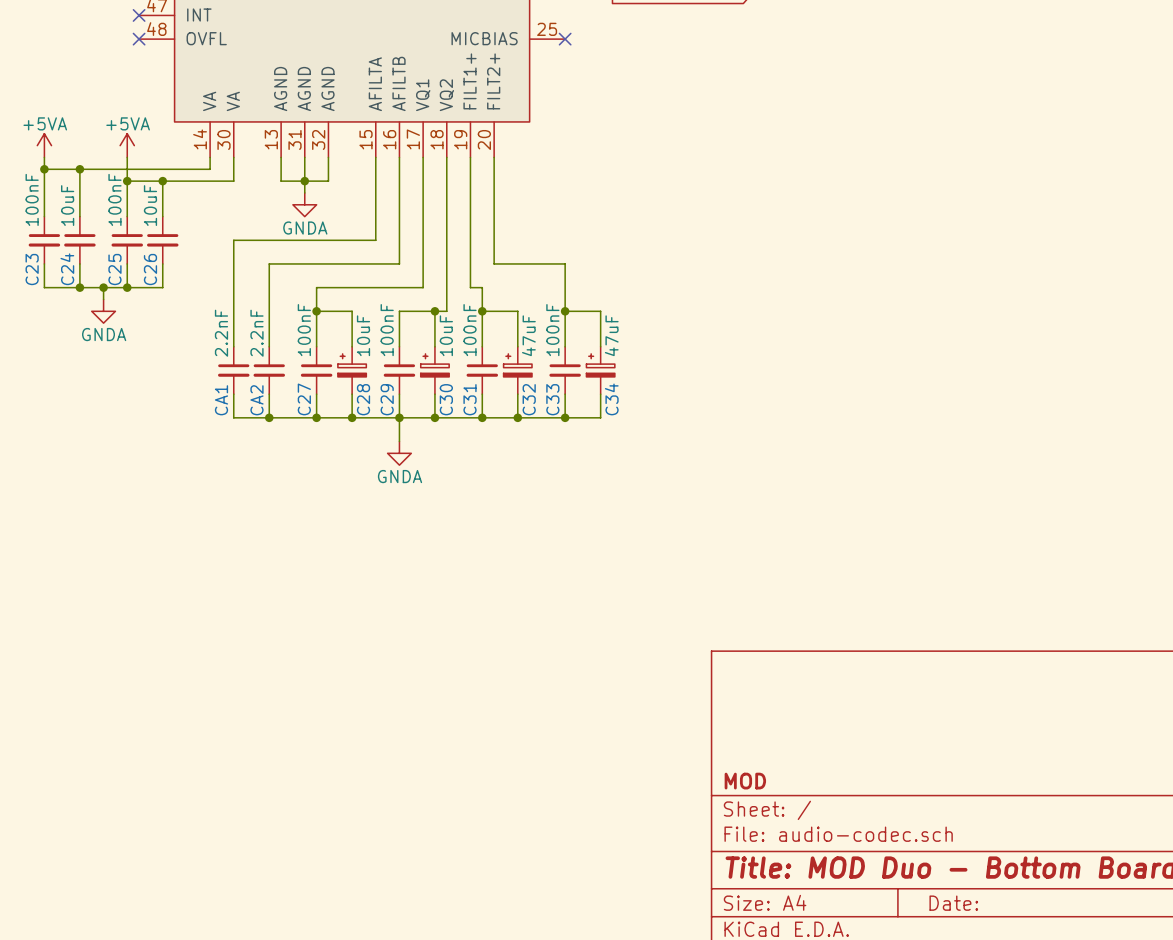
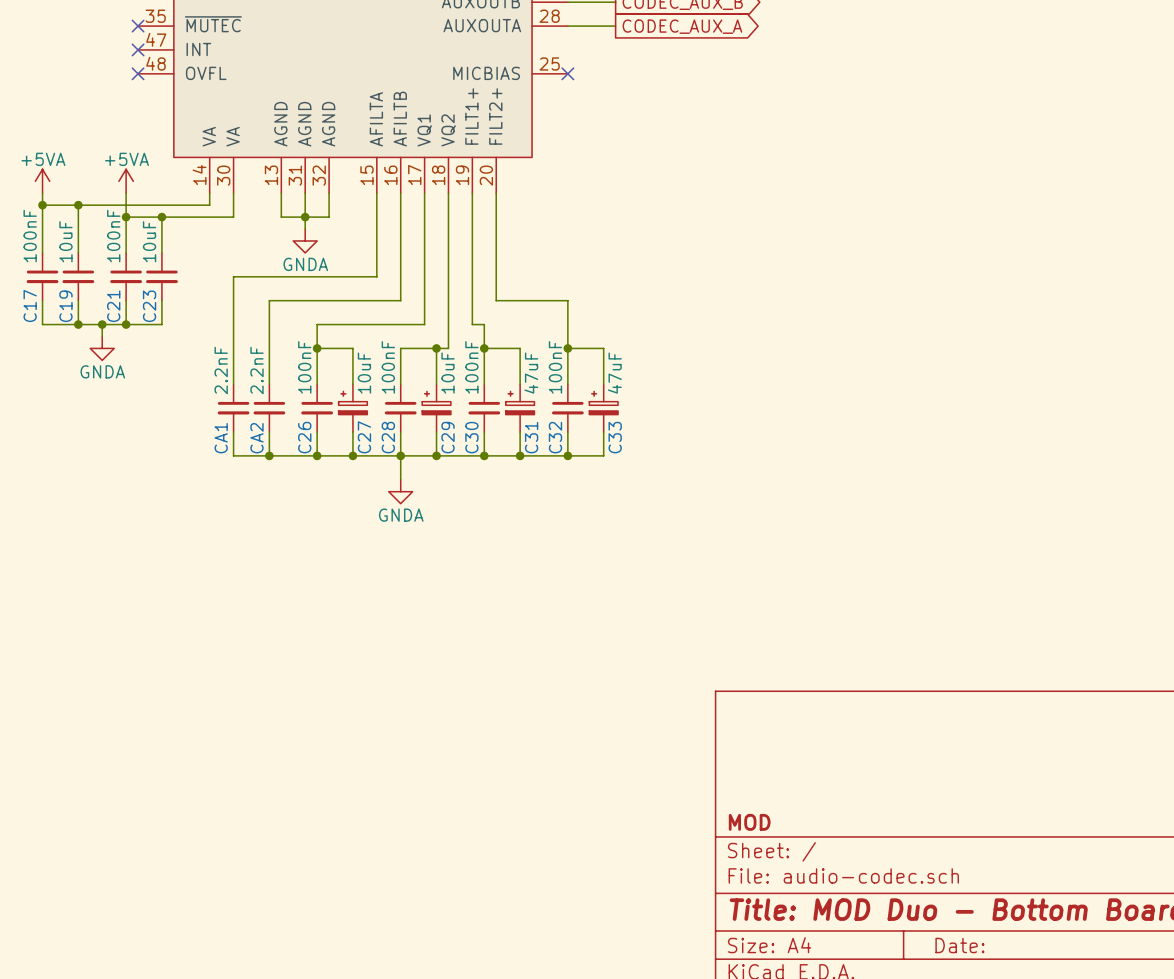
C23 name: C23 (32, 269) -> C17 (30, 305)
C24 name: C24 (67, 269) -> C19 (65, 306)
C25 name: C25 (114, 269) -> C21 (113, 306)
C26 name: C26 (150, 269) -> C23 (149, 306)
C27 name: C27 (304, 399) -> C26 (304, 437)
C28 name: C28 (363, 399) -> C27 (364, 437)
C29 name: C29 (387, 399) -> C28 (388, 437)
C30 name: C30 (446, 399) -> C29 (448, 437)
C31 name: C31 (470, 399) -> C30 (471, 437)
C32 name: C32 (529, 399) -> C31 (531, 437)
C33 name: C33 (552, 399) -> C32 (555, 437)
C34 name: C34 (611, 399) -> C33 (615, 437)

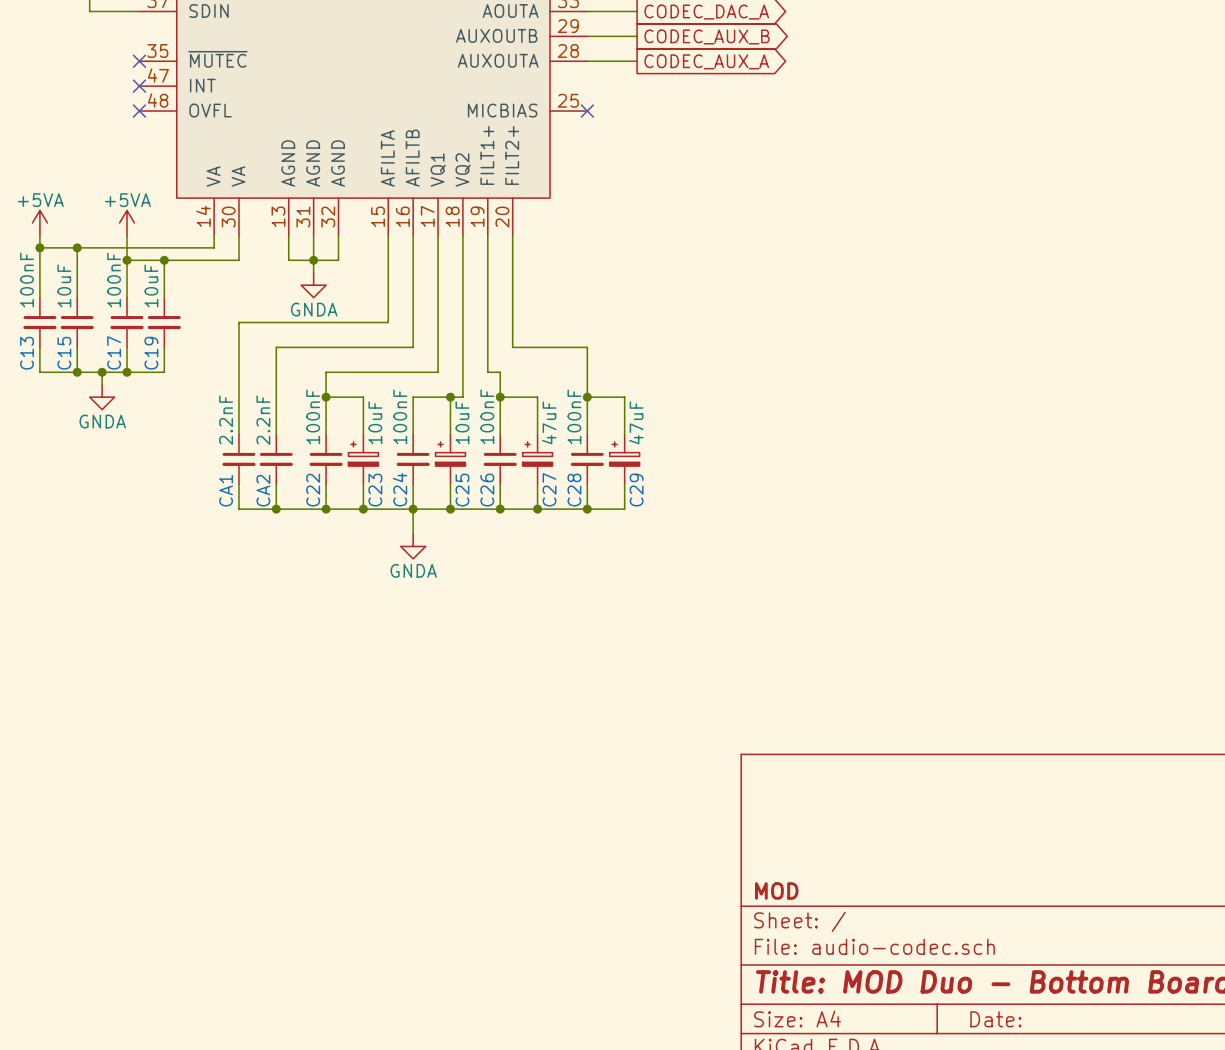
C17 name: C17 (30, 305) -> C13 (27, 353)
C19 name: C19 (65, 306) -> C15 (64, 353)
C21 name: C21 (113, 306) -> C17 (114, 352)
C23 name: C23 (149, 306) -> C19 (151, 353)
C26 name: C26 (304, 437) -> C22 (313, 490)
C27 name: C27 (364, 437) -> C23 (375, 490)
C28 name: C28 (388, 437) -> C24 (399, 489)
C29 name: C29 (448, 437) -> C25 (462, 490)
C30 name: C30 (471, 437) -> C26 (487, 490)
C31 name: C31 (531, 437) -> C27 (549, 489)
C32 name: C32 (555, 437) -> C28 (574, 490)
C33 name: C33 (615, 437) -> C29 (636, 490)

